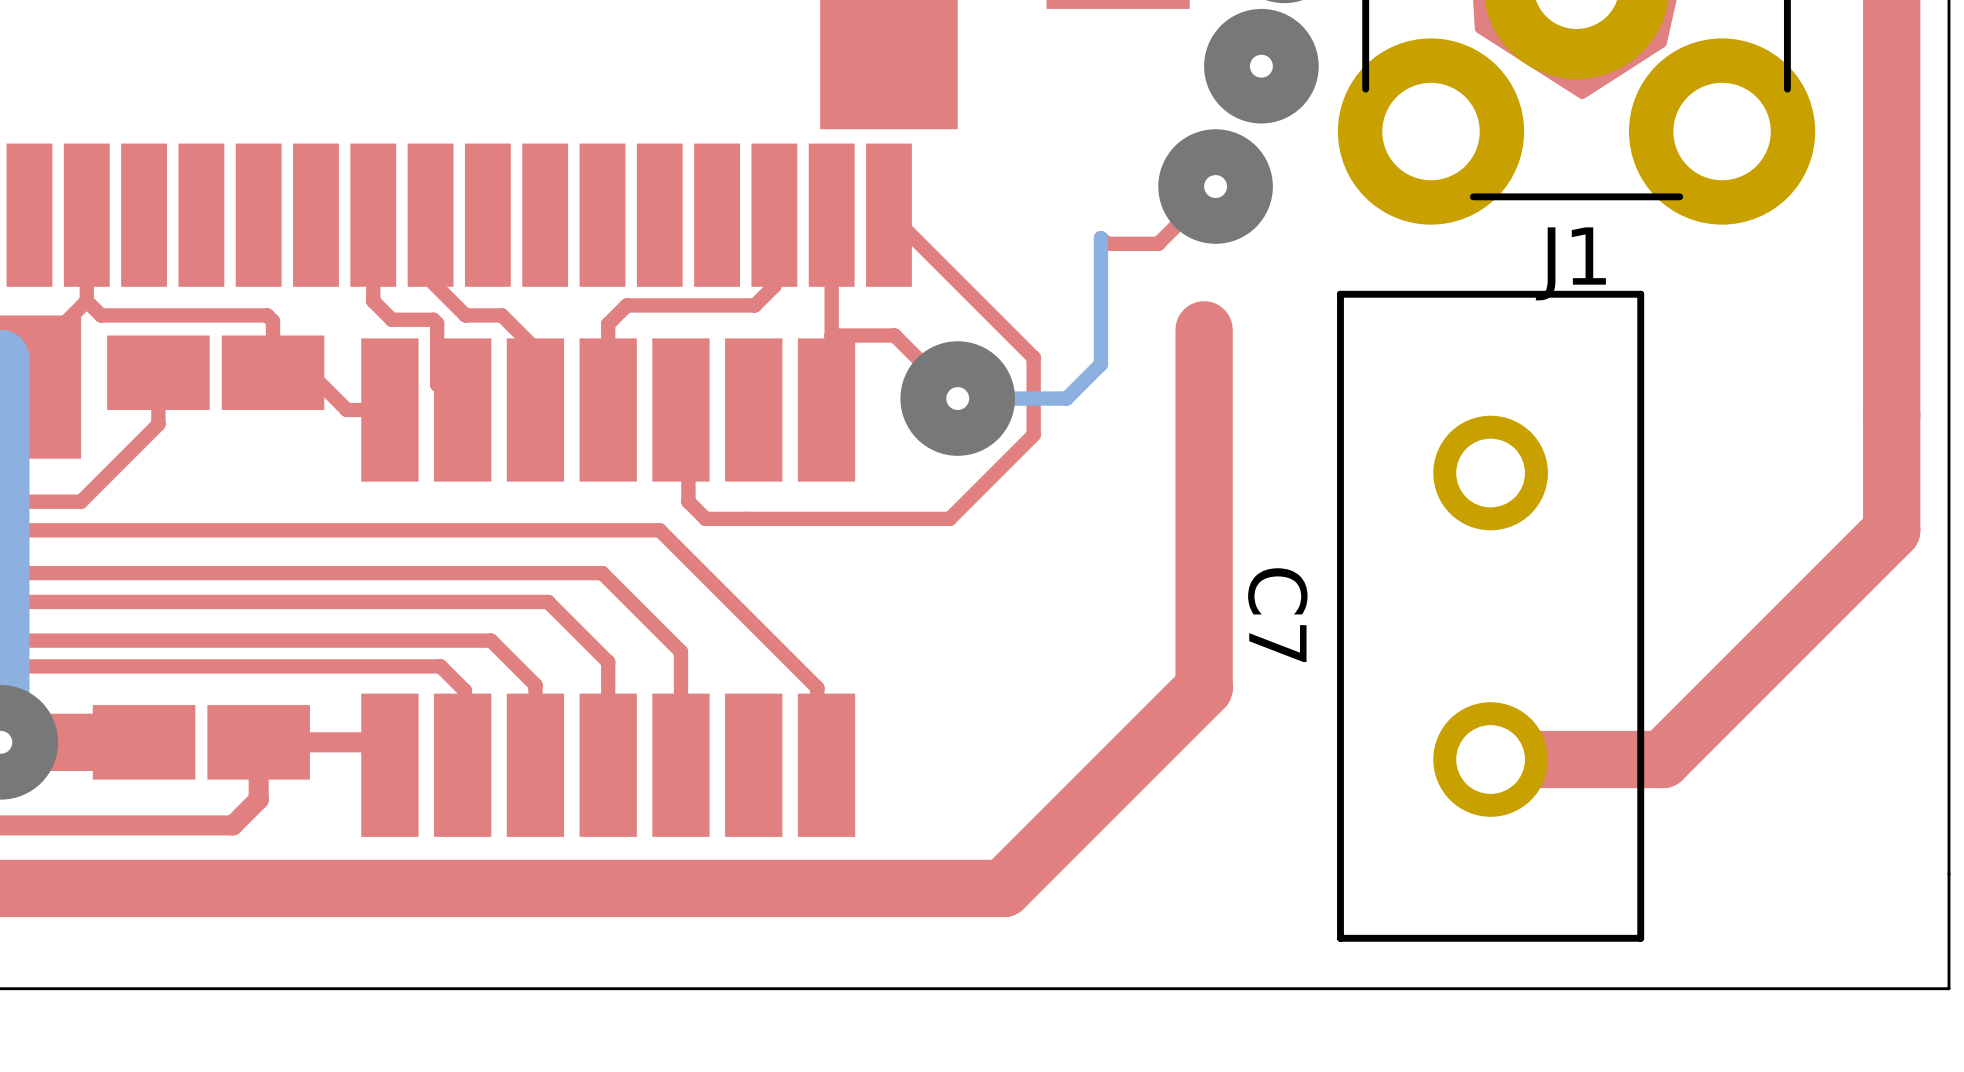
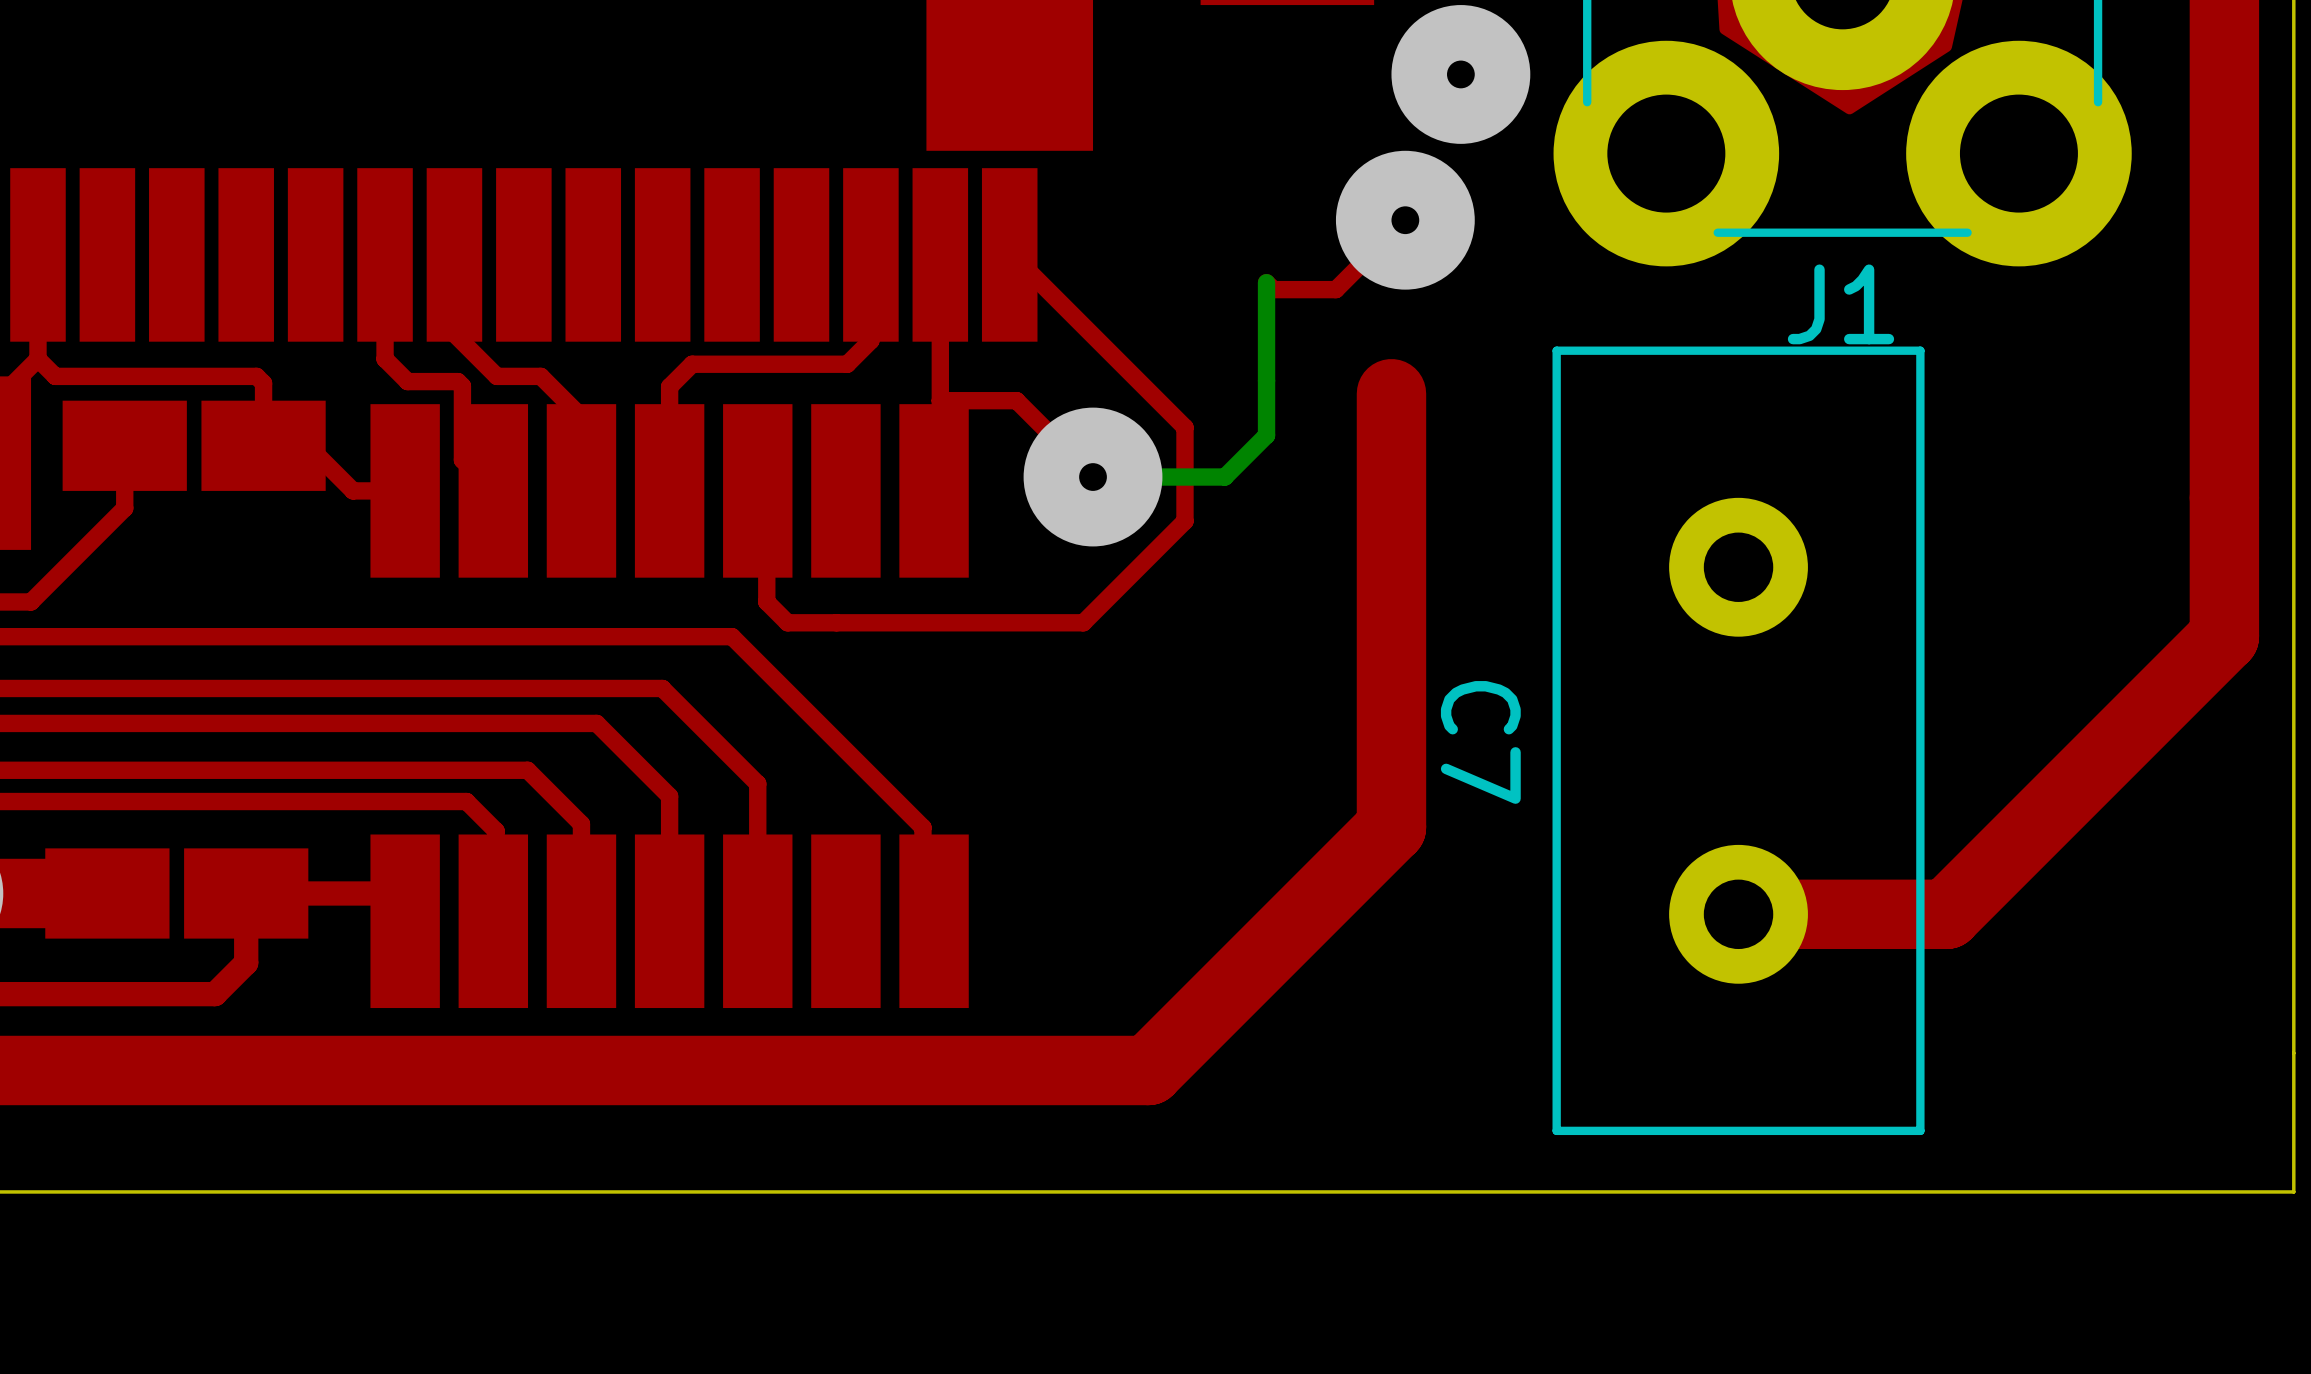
C7 footprint: [1337, 290, 1645, 942] -> [1552, 346, 1925, 1136]

